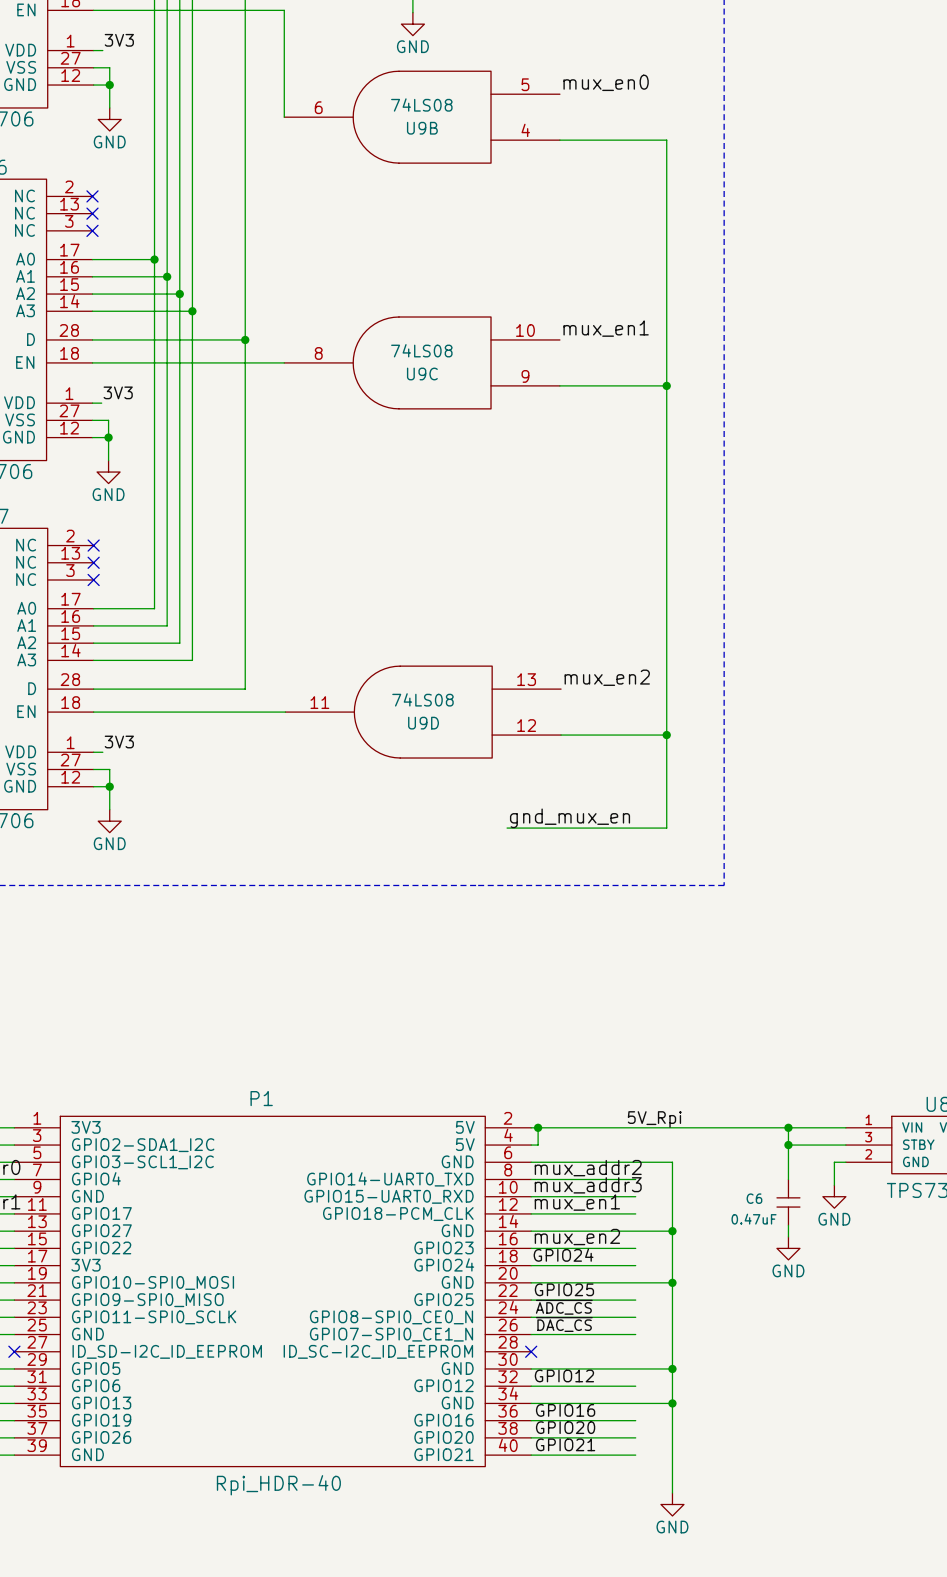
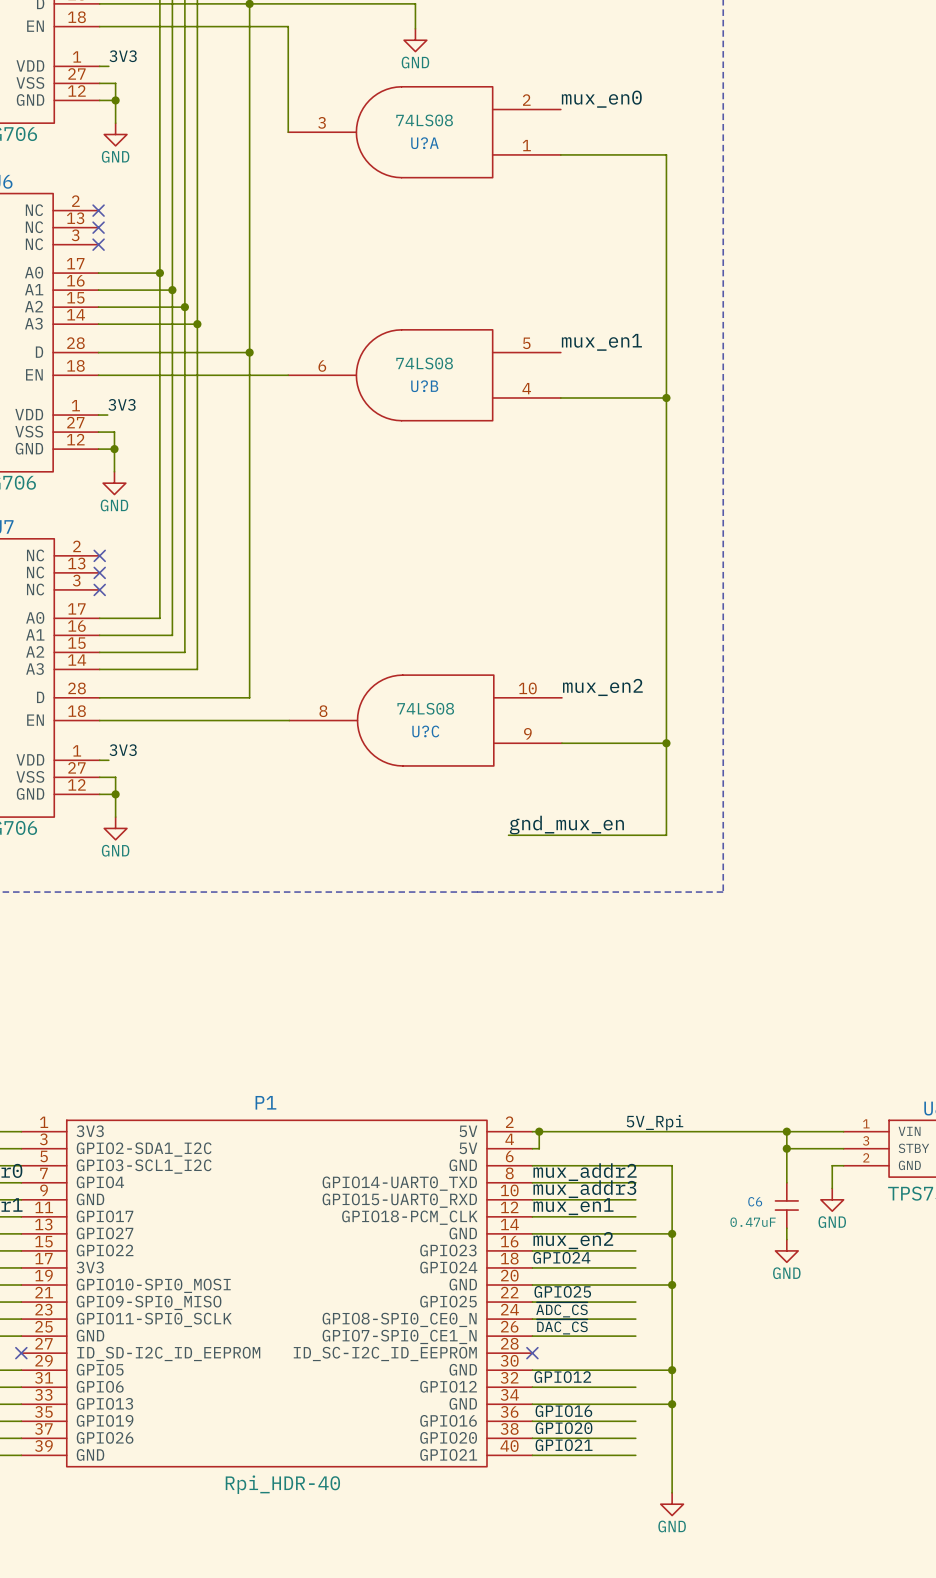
U9B pin number: 5 (525, 84) -> 2 (526, 100)
U9B pin number: 6 (318, 107) -> 3 (322, 122)
U9B name: U9B (422, 128) -> U?A (424, 143)
U9B pin number: 4 (525, 130) -> 1 (526, 145)
U9C pin number: 10 (525, 330) -> 5 (526, 343)
U9C pin number: 8 (318, 353) -> 6 (322, 366)
U9C name: U9C (422, 373) -> U?B (424, 386)
U9C pin number: 9 (525, 376) -> 4 (526, 388)
U9D pin number: 13 (526, 679) -> 10 (527, 688)
U9D pin number: 11 (319, 702) -> 8 (323, 711)
U9D name: U9D (423, 723) -> U?C (425, 731)
U9D pin number: 12 (526, 725) -> 9 (527, 733)

